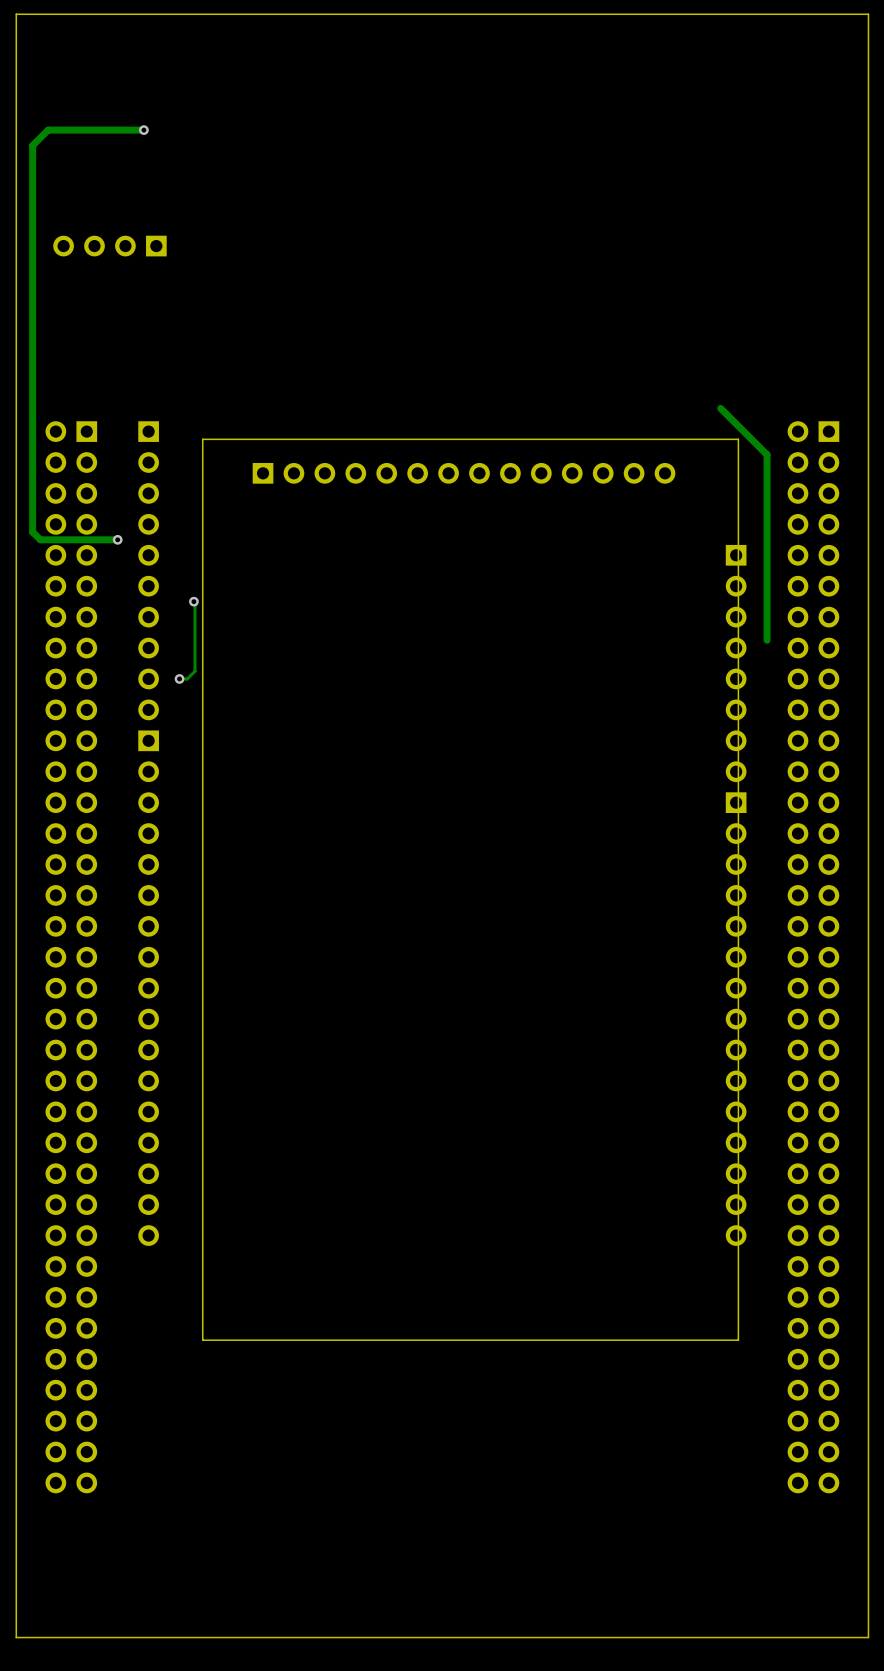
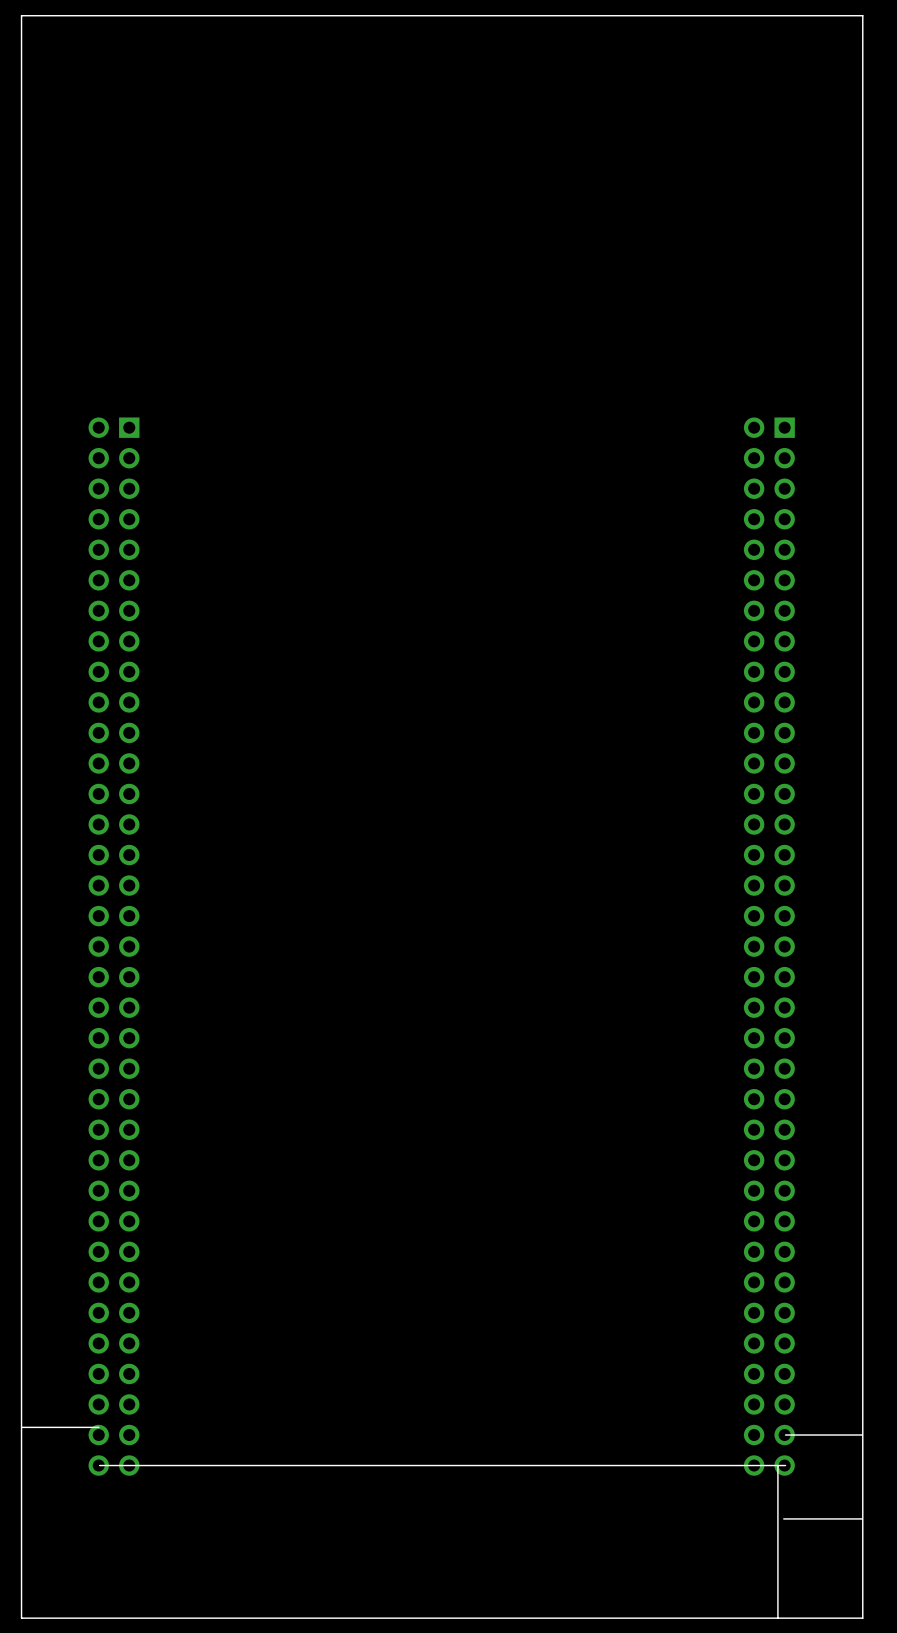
track: (143, 130) (48, 130) (32, 145) (32, 532) (40, 539) (117, 539) -> none
via: (143, 130) -> none
part: (109, 246) -> none
track: (720, 408) (767, 454) (767, 640) -> none
board edge: (738, 439) (202, 439) (202, 1340) (738, 1340) (738, 439) -> none
part: (464, 473) -> none
via: (117, 539) -> none
part: (148, 570) -> none
track: (193, 601) (195, 671) (187, 678) (179, 678) -> none
via: (193, 601) -> none
part: (736, 663) -> none
via: (179, 678) -> none
part position: (71, 957) -> (114, 946)
part position: (813, 957) -> (769, 946)
part: (148, 988) -> none
part: (736, 1019) -> none
board edge: none -> (98, 1427) (22, 1427)
board edge: none -> (861, 1435) (785, 1435)
board edge: none -> (777, 1465) (777, 1618)
board edge: none -> (785, 1465) (99, 1465)
board edge: none -> (861, 1518) (783, 1518)

